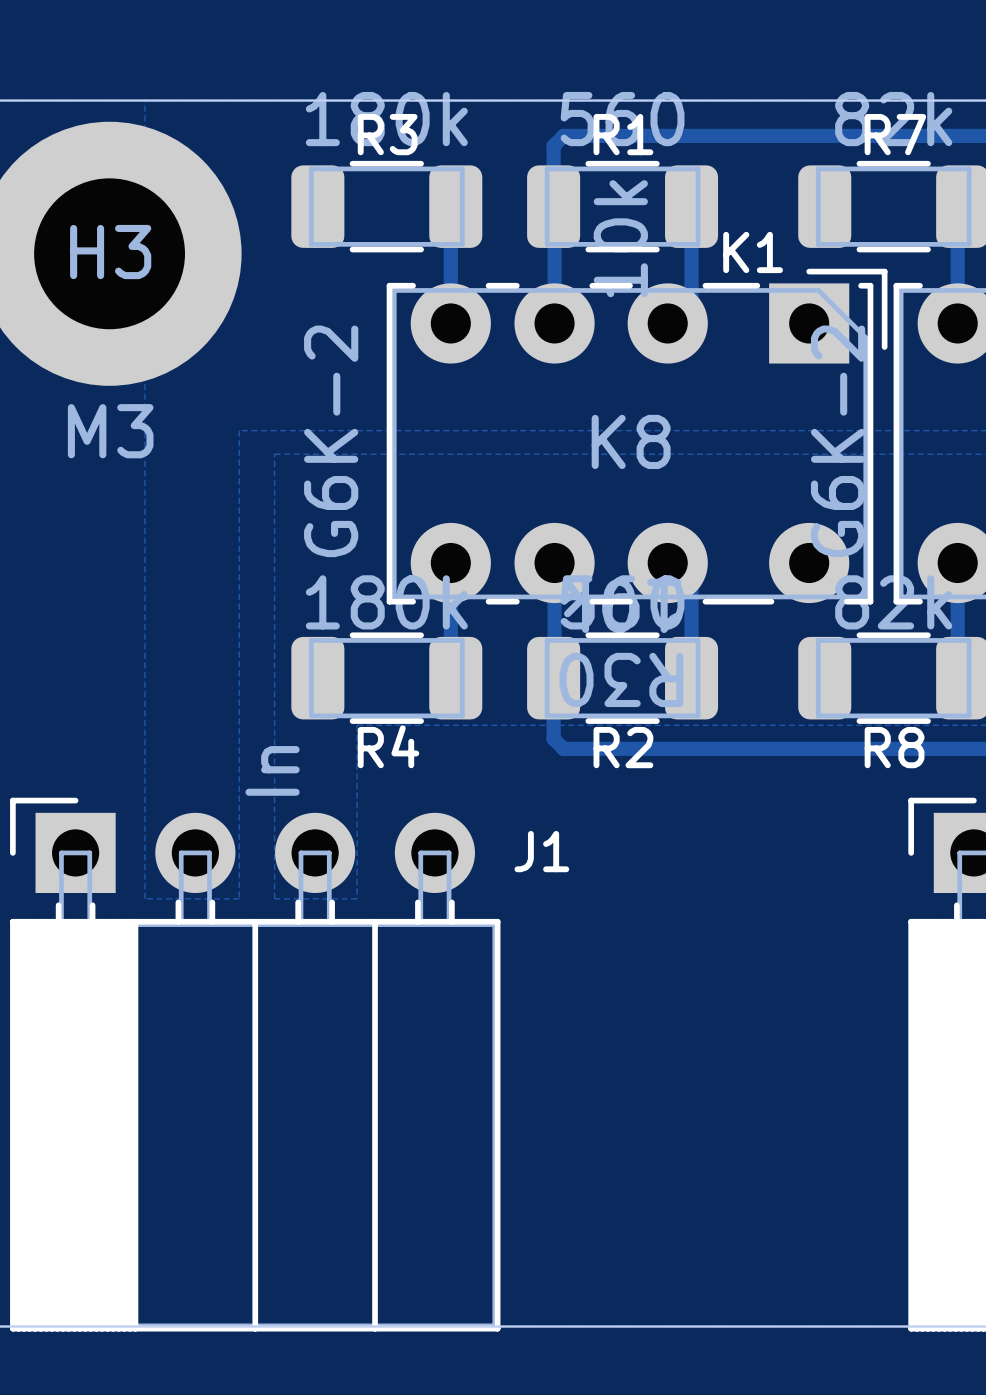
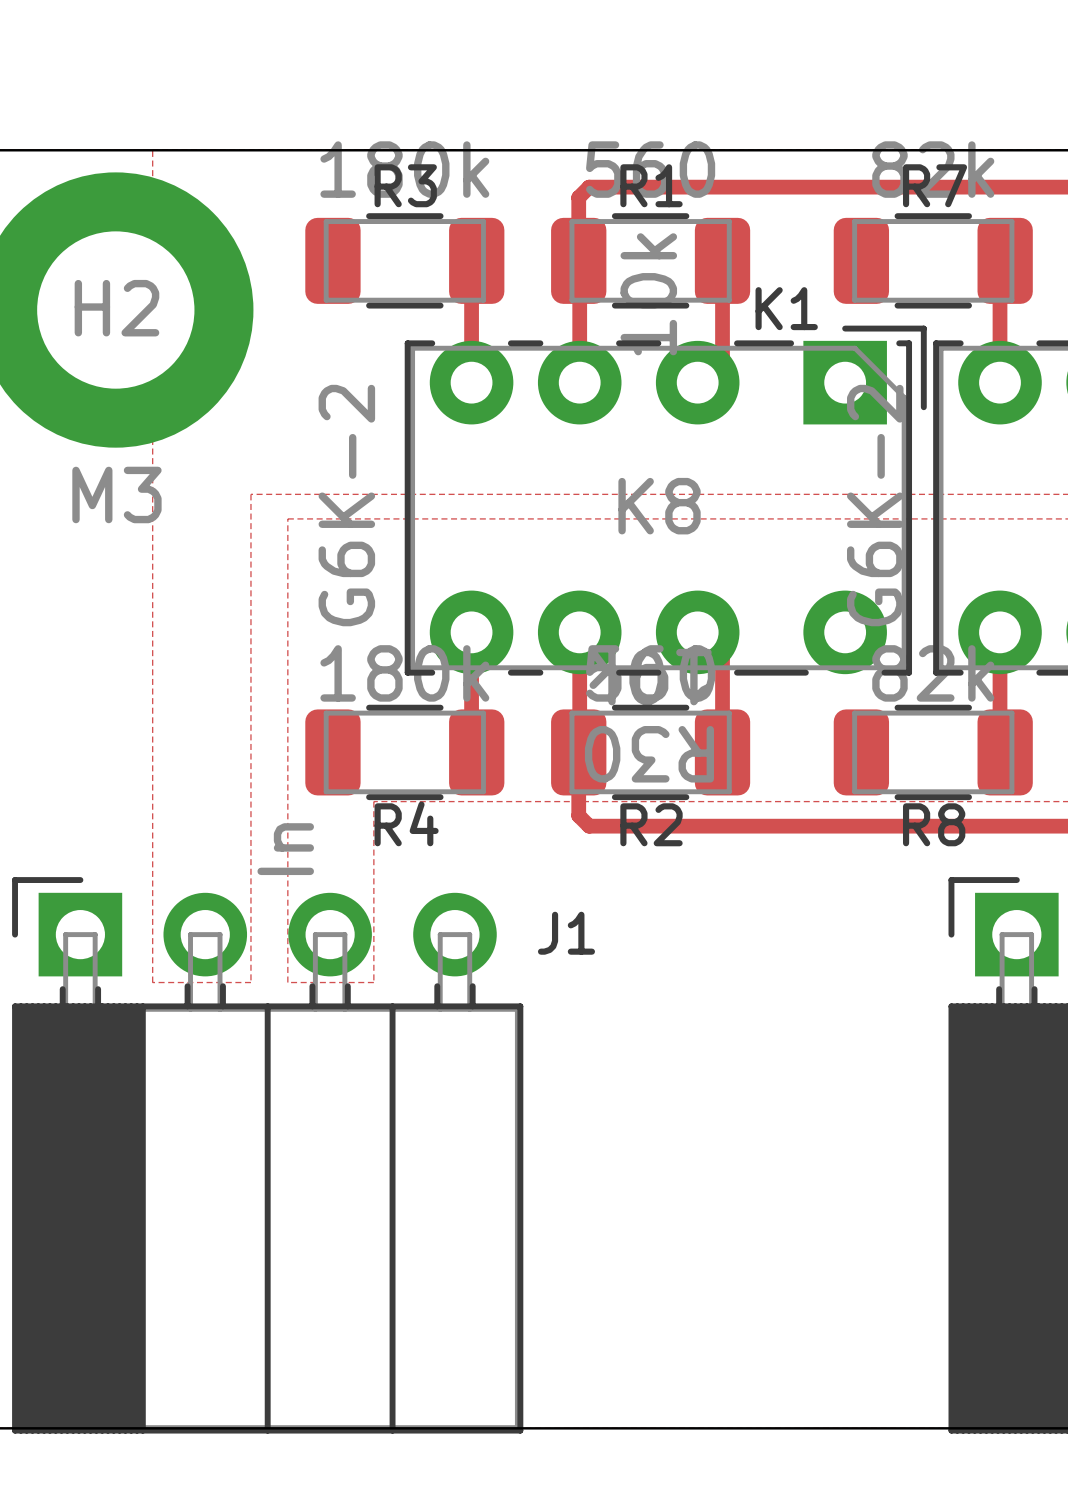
H3 name: H3 (110, 252) -> H2 (116, 308)

